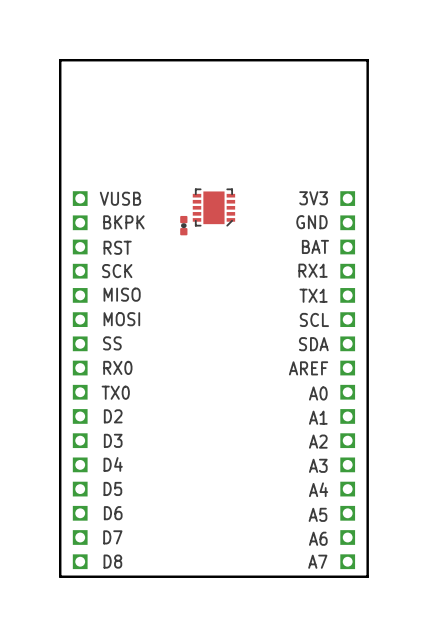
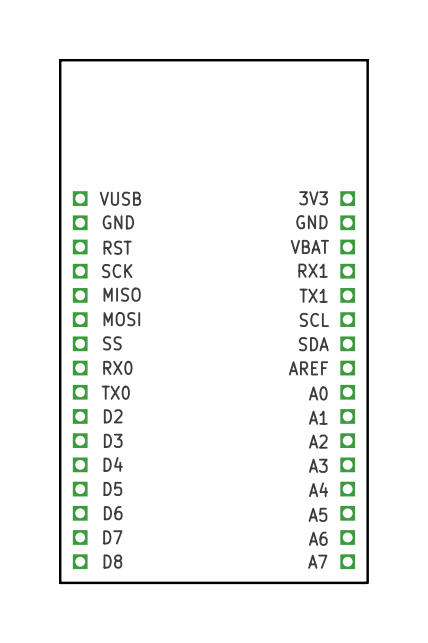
part: (213, 207) -> none
text: BKPK (123, 222) -> GND (118, 222)
part: (183, 225) -> none
text: BAT (315, 246) -> VBAT (309, 246)
board edge: (60, 576) (367, 576) -> (367, 582) (367, 576)
board edge: none -> (60, 576) (60, 582)
board edge: none -> (366, 582) (60, 582)

